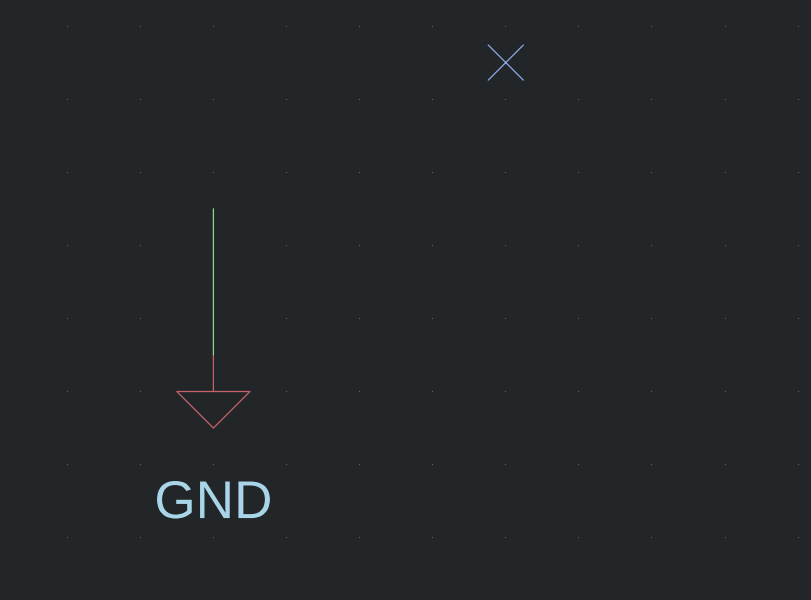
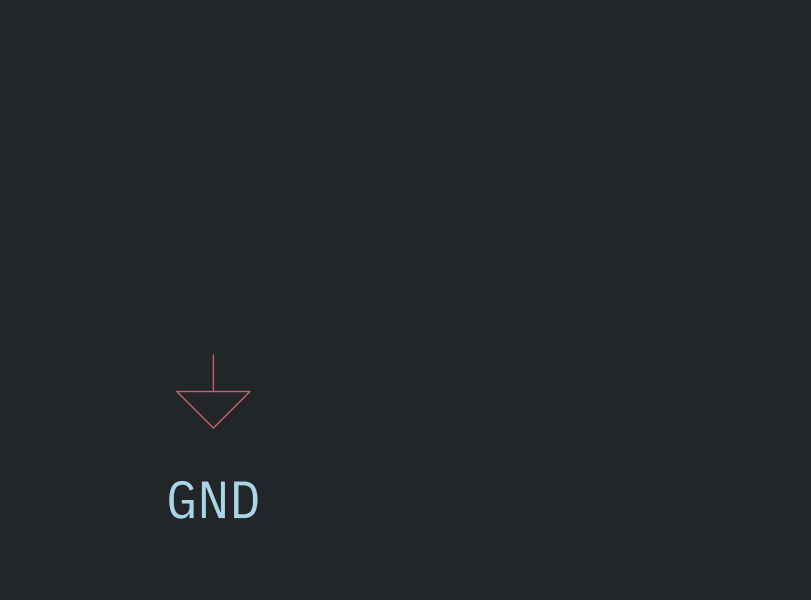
no-connect mark: (505, 62) -> none
wire: (213, 208) (213, 354) -> none

